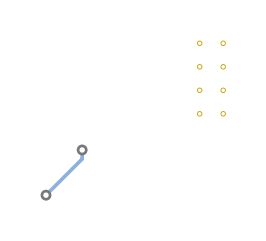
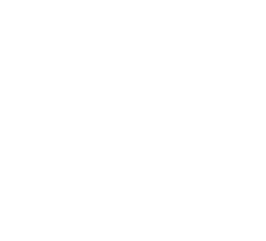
part: (211, 78) -> none
track: (82, 149) (82, 159) (45, 195) -> none
via: (82, 149) -> none
via: (45, 195) -> none

